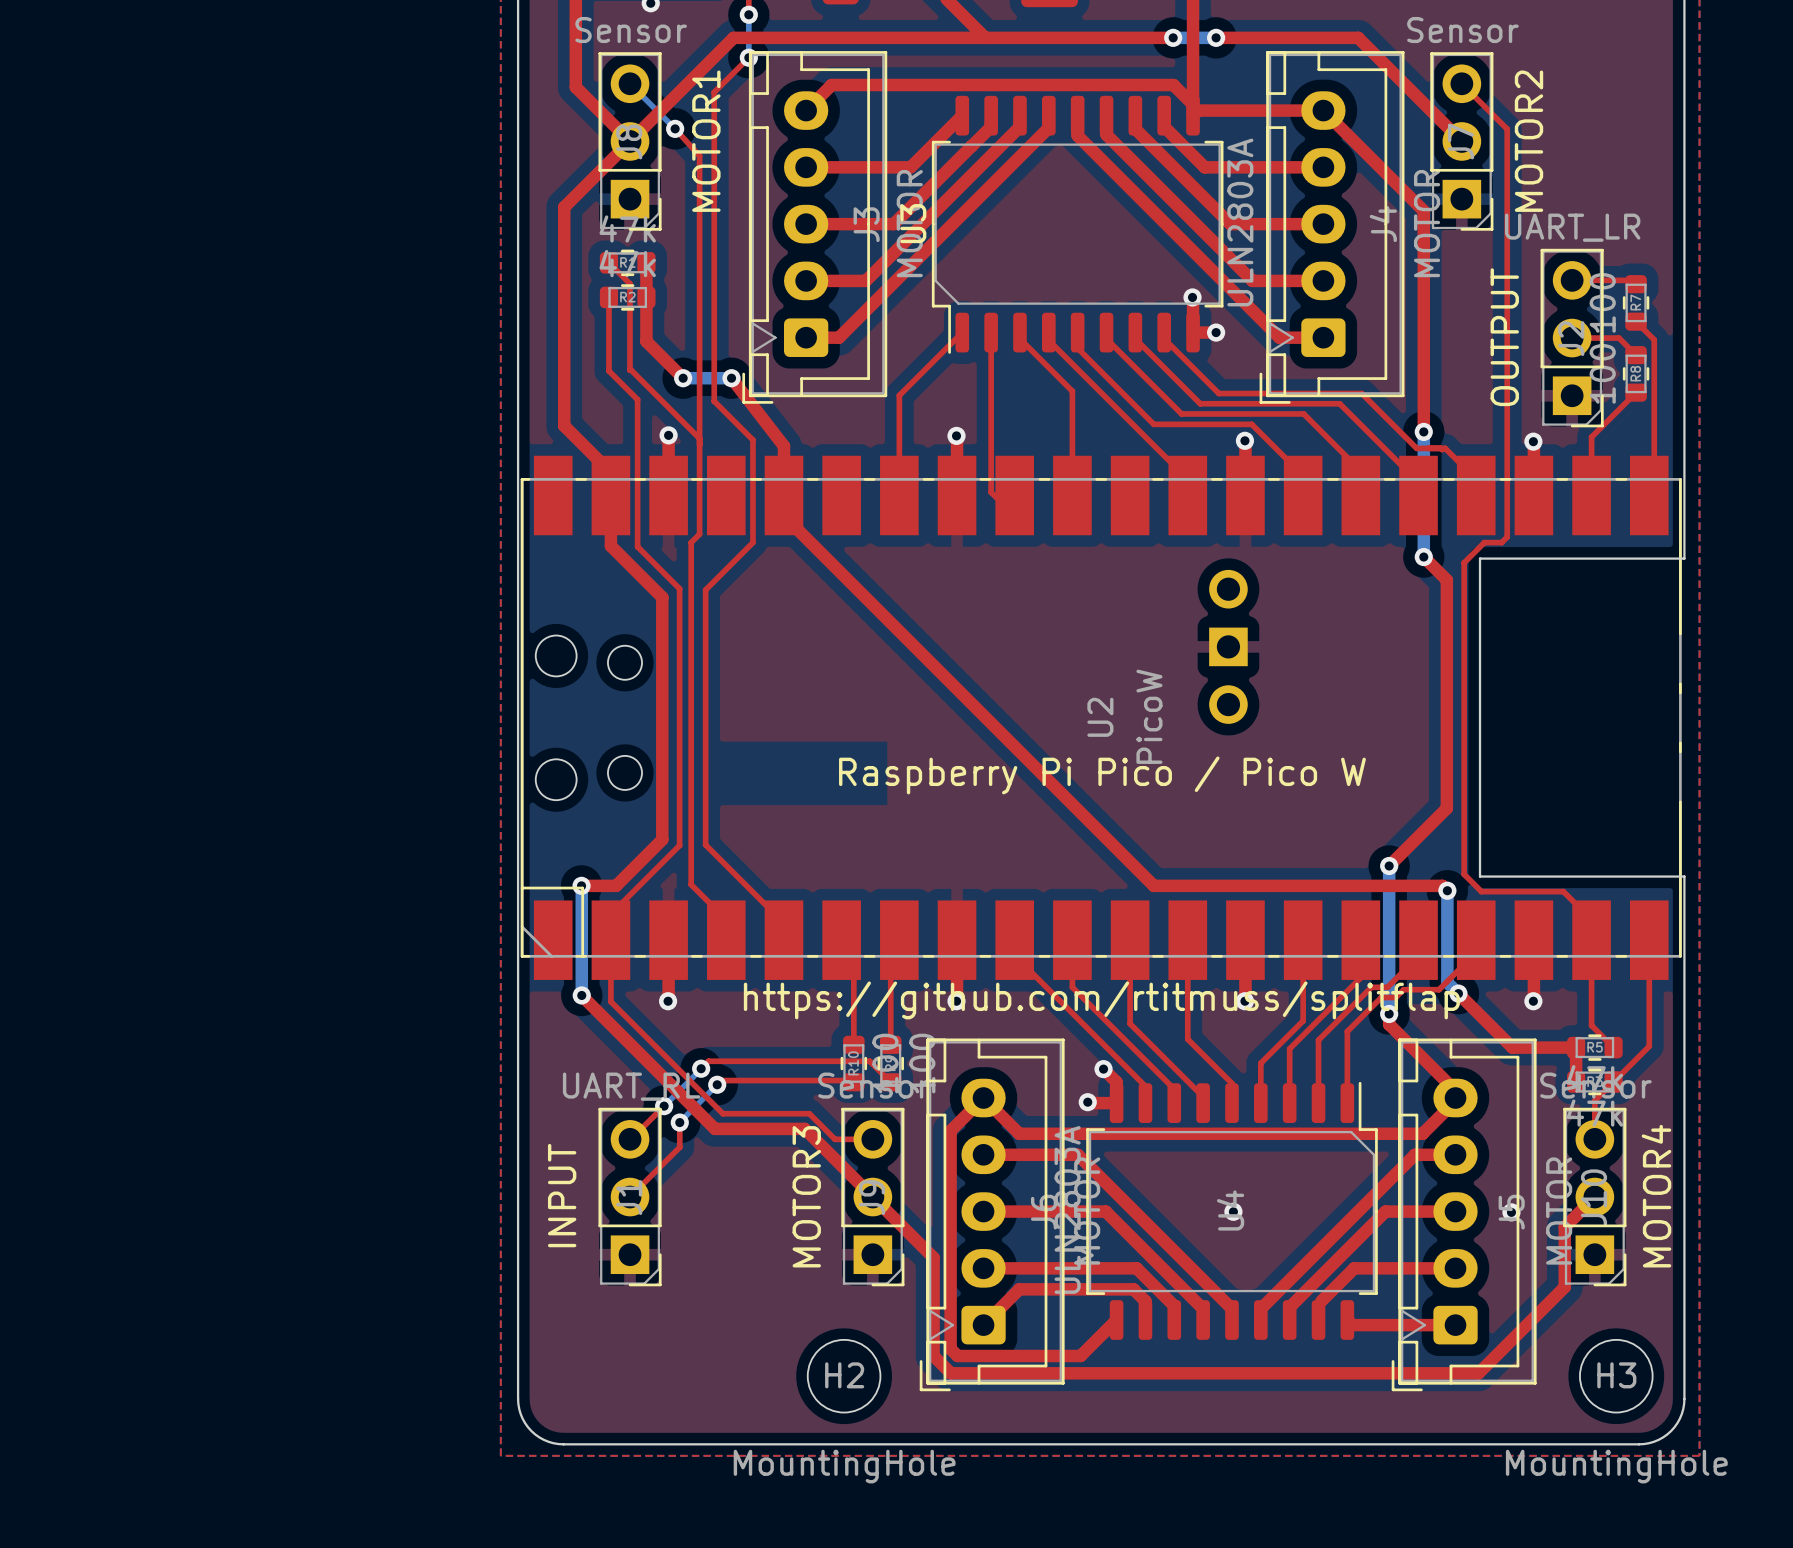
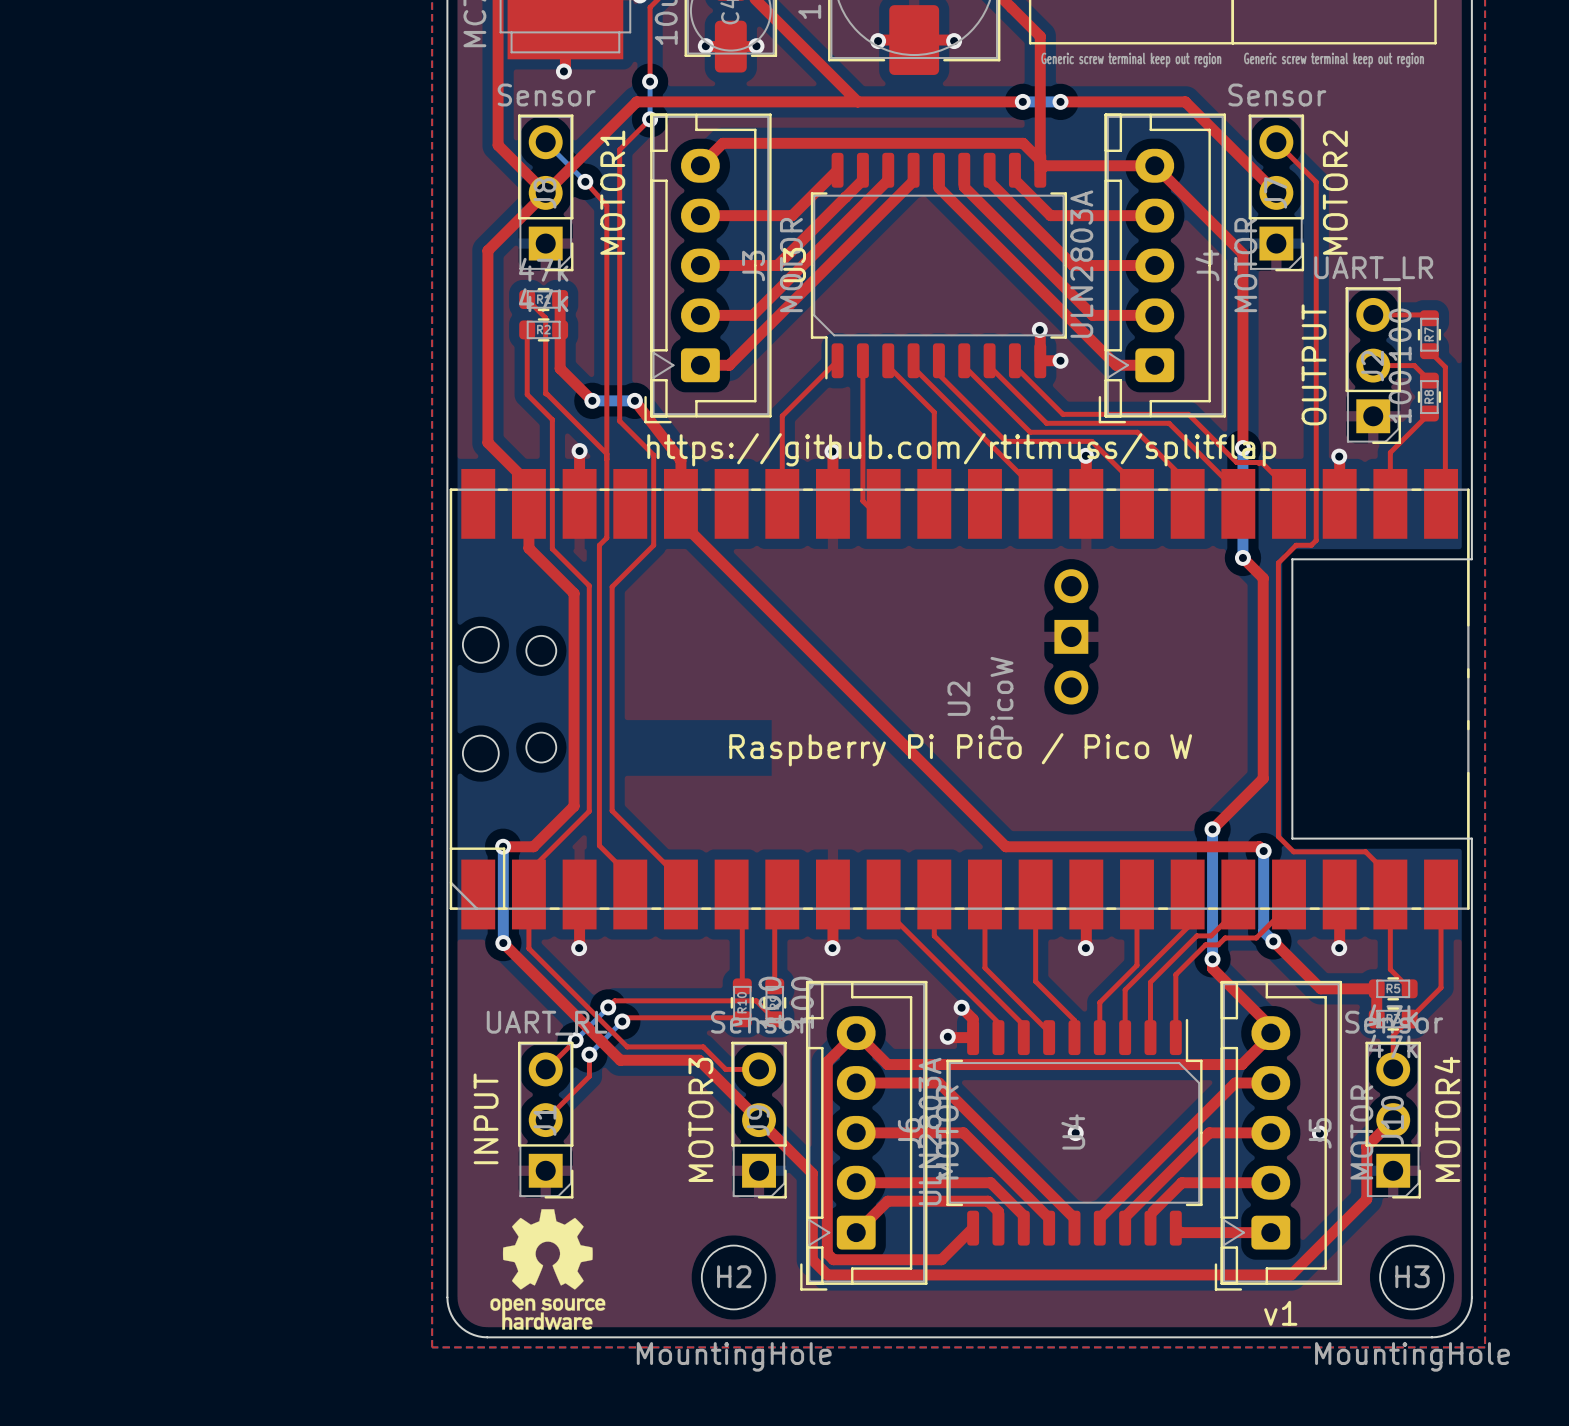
text position: https://github.com/rtitmuss/splitflap (1101, 1000) -> https://github.com/rtitmuss/splitflap (961, 449)
drawing: none -> [490, 1209, 606, 1330]
text: none -> v1 (1280, 1313)

